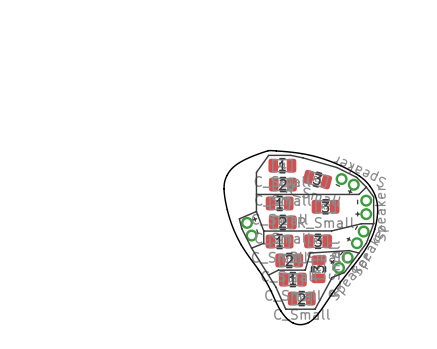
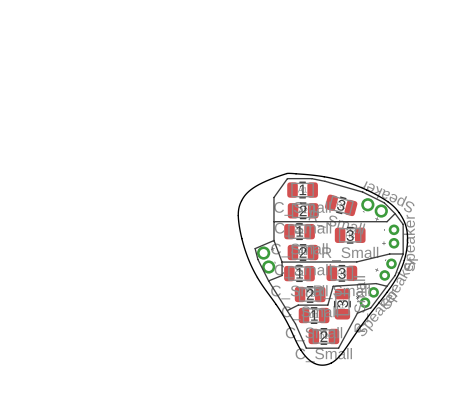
part footprint: [360, 194, 373, 221] -> [388, 224, 400, 249]
part footprint: [350, 225, 370, 250] -> [379, 258, 397, 281]
part footprint: [333, 251, 354, 274] -> [359, 287, 379, 308]

